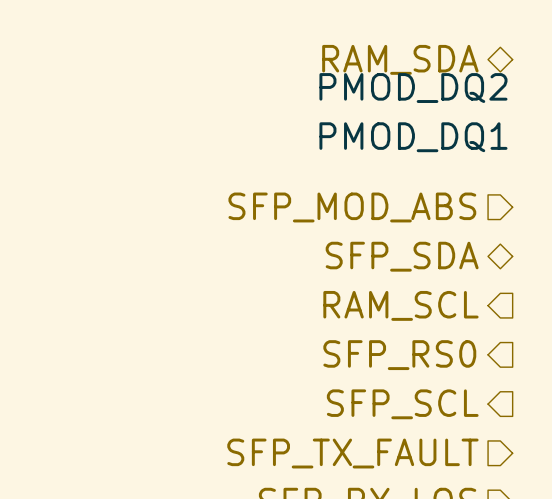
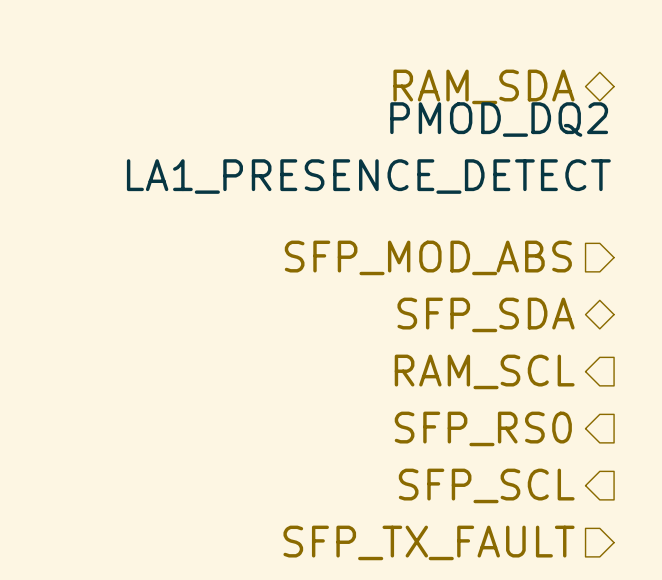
label: PMOD_DQ1 (413, 137) -> LA1_PRESENCE_DETECT (368, 176)

